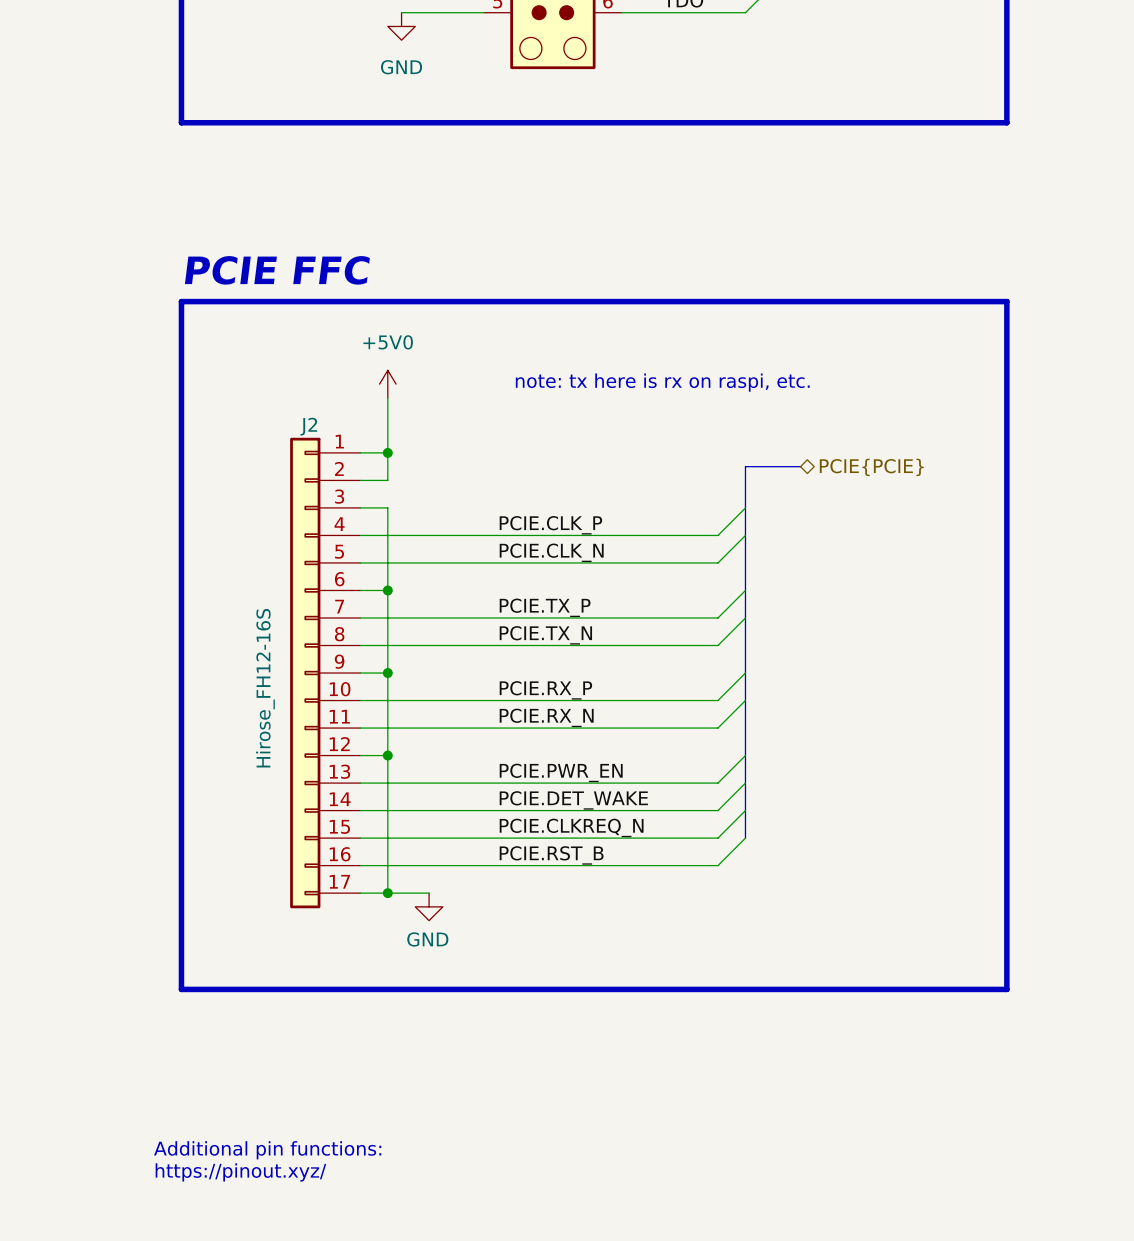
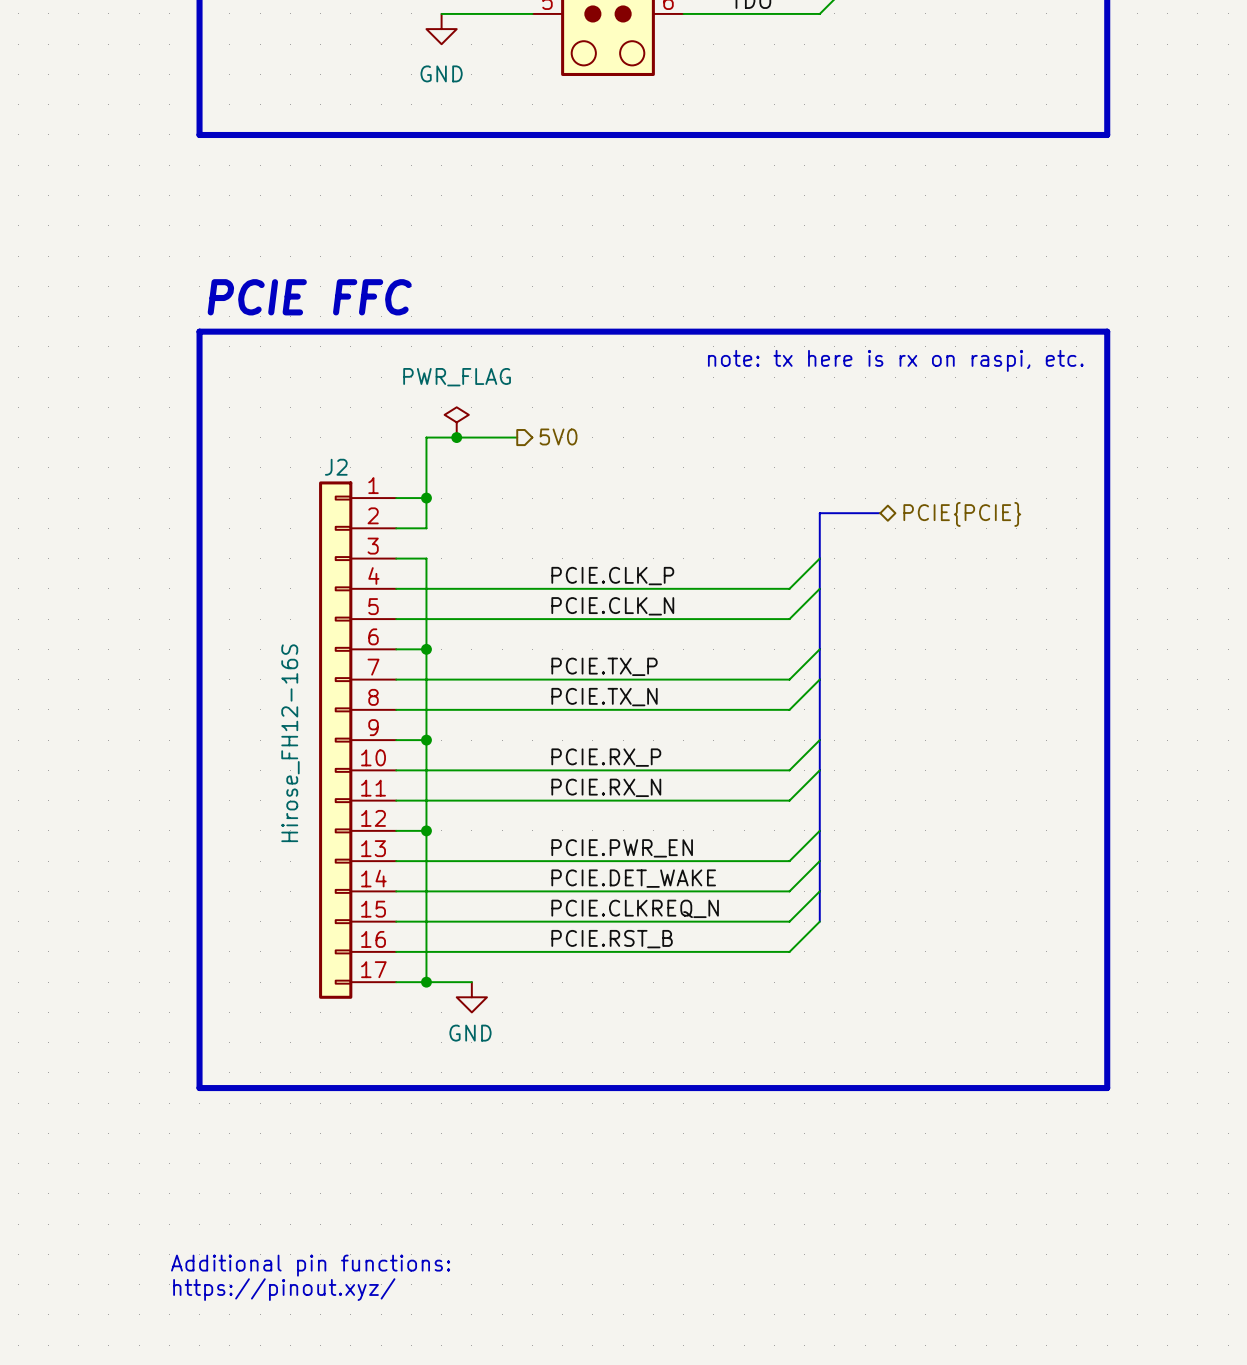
text position: note: tx here is rx on raspi, etc. (662, 382) -> note: tx here is rx on raspi, etc. (895, 360)
power symbol: +5V0 (387, 384) -> none
power symbol: none -> PWR_FLAG (456, 422)
wire: none -> (426, 437) (517, 437)
junction: none -> (456, 437)
hierarchical label: none -> 5V0 (558, 436)

